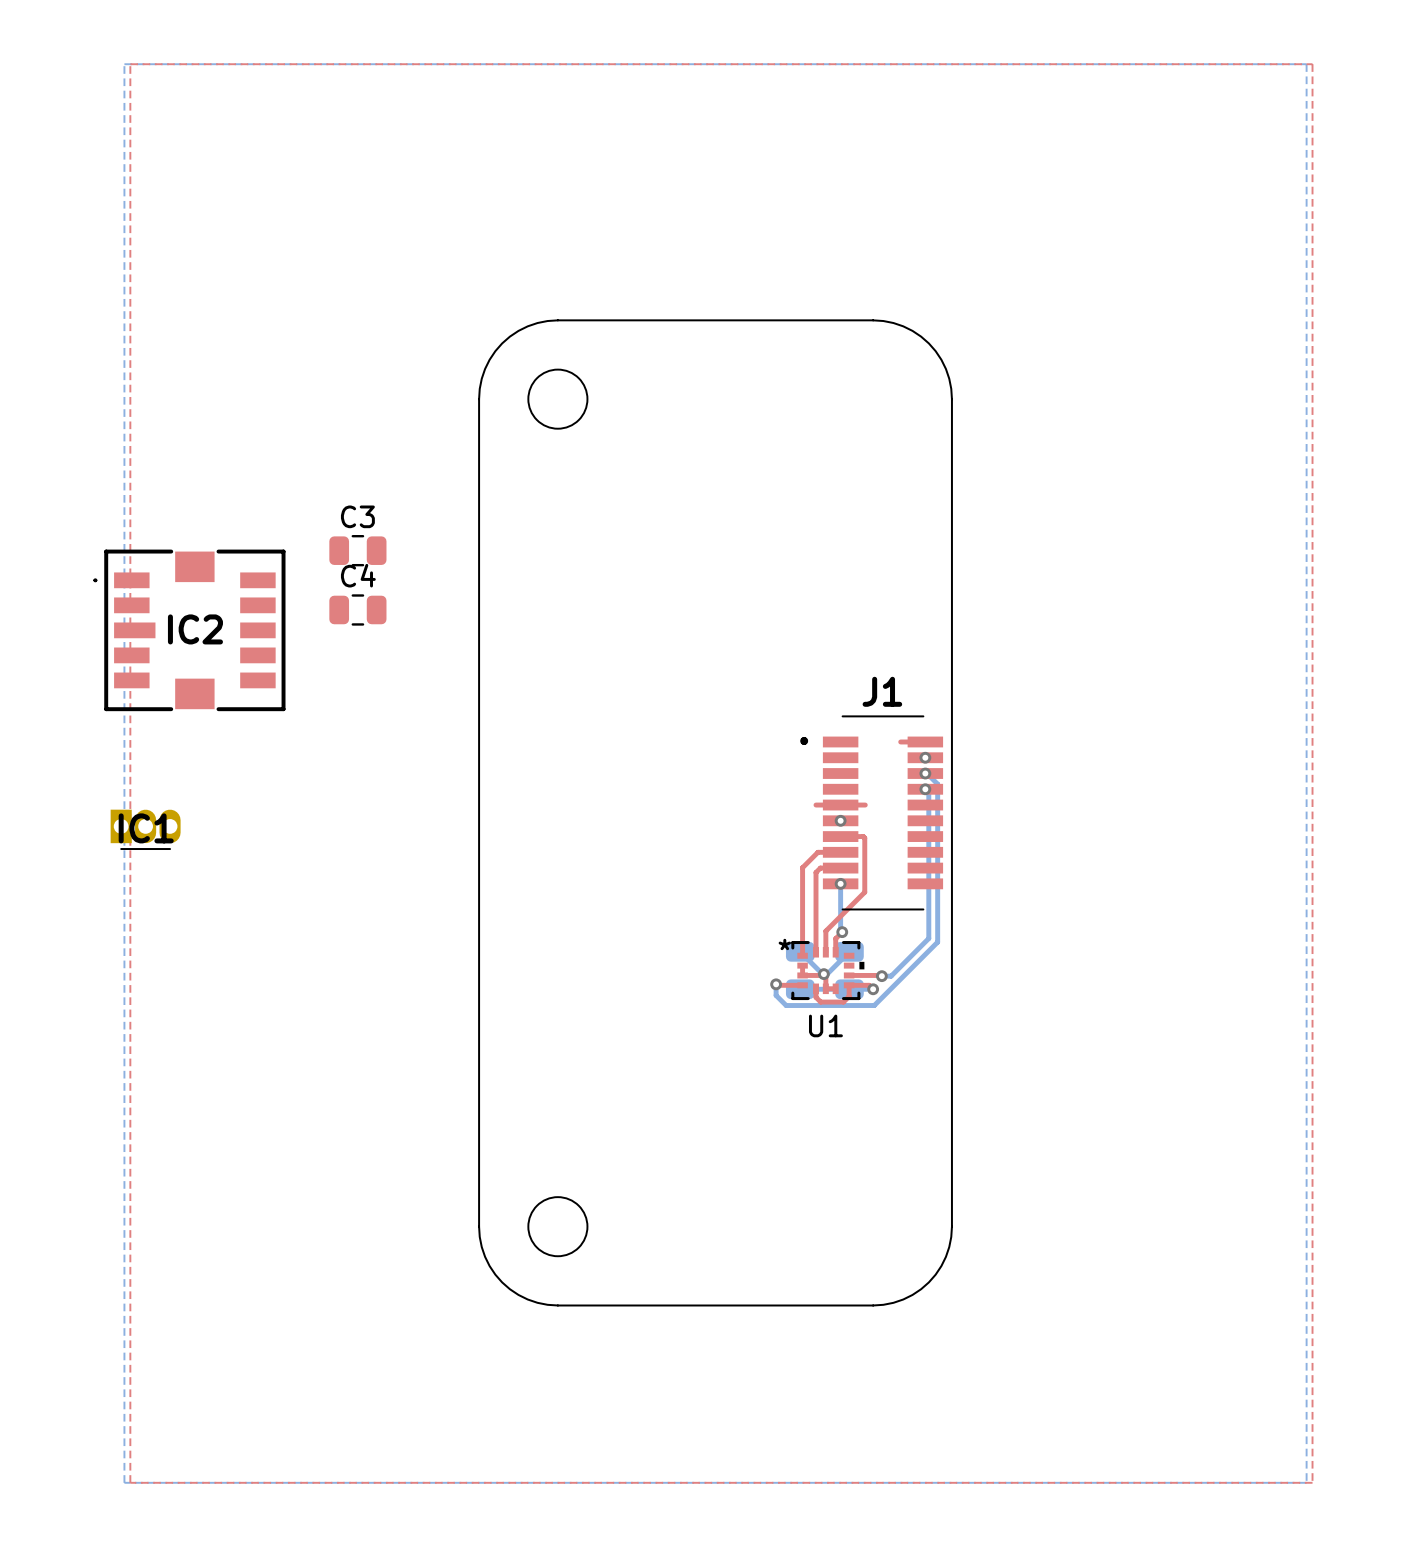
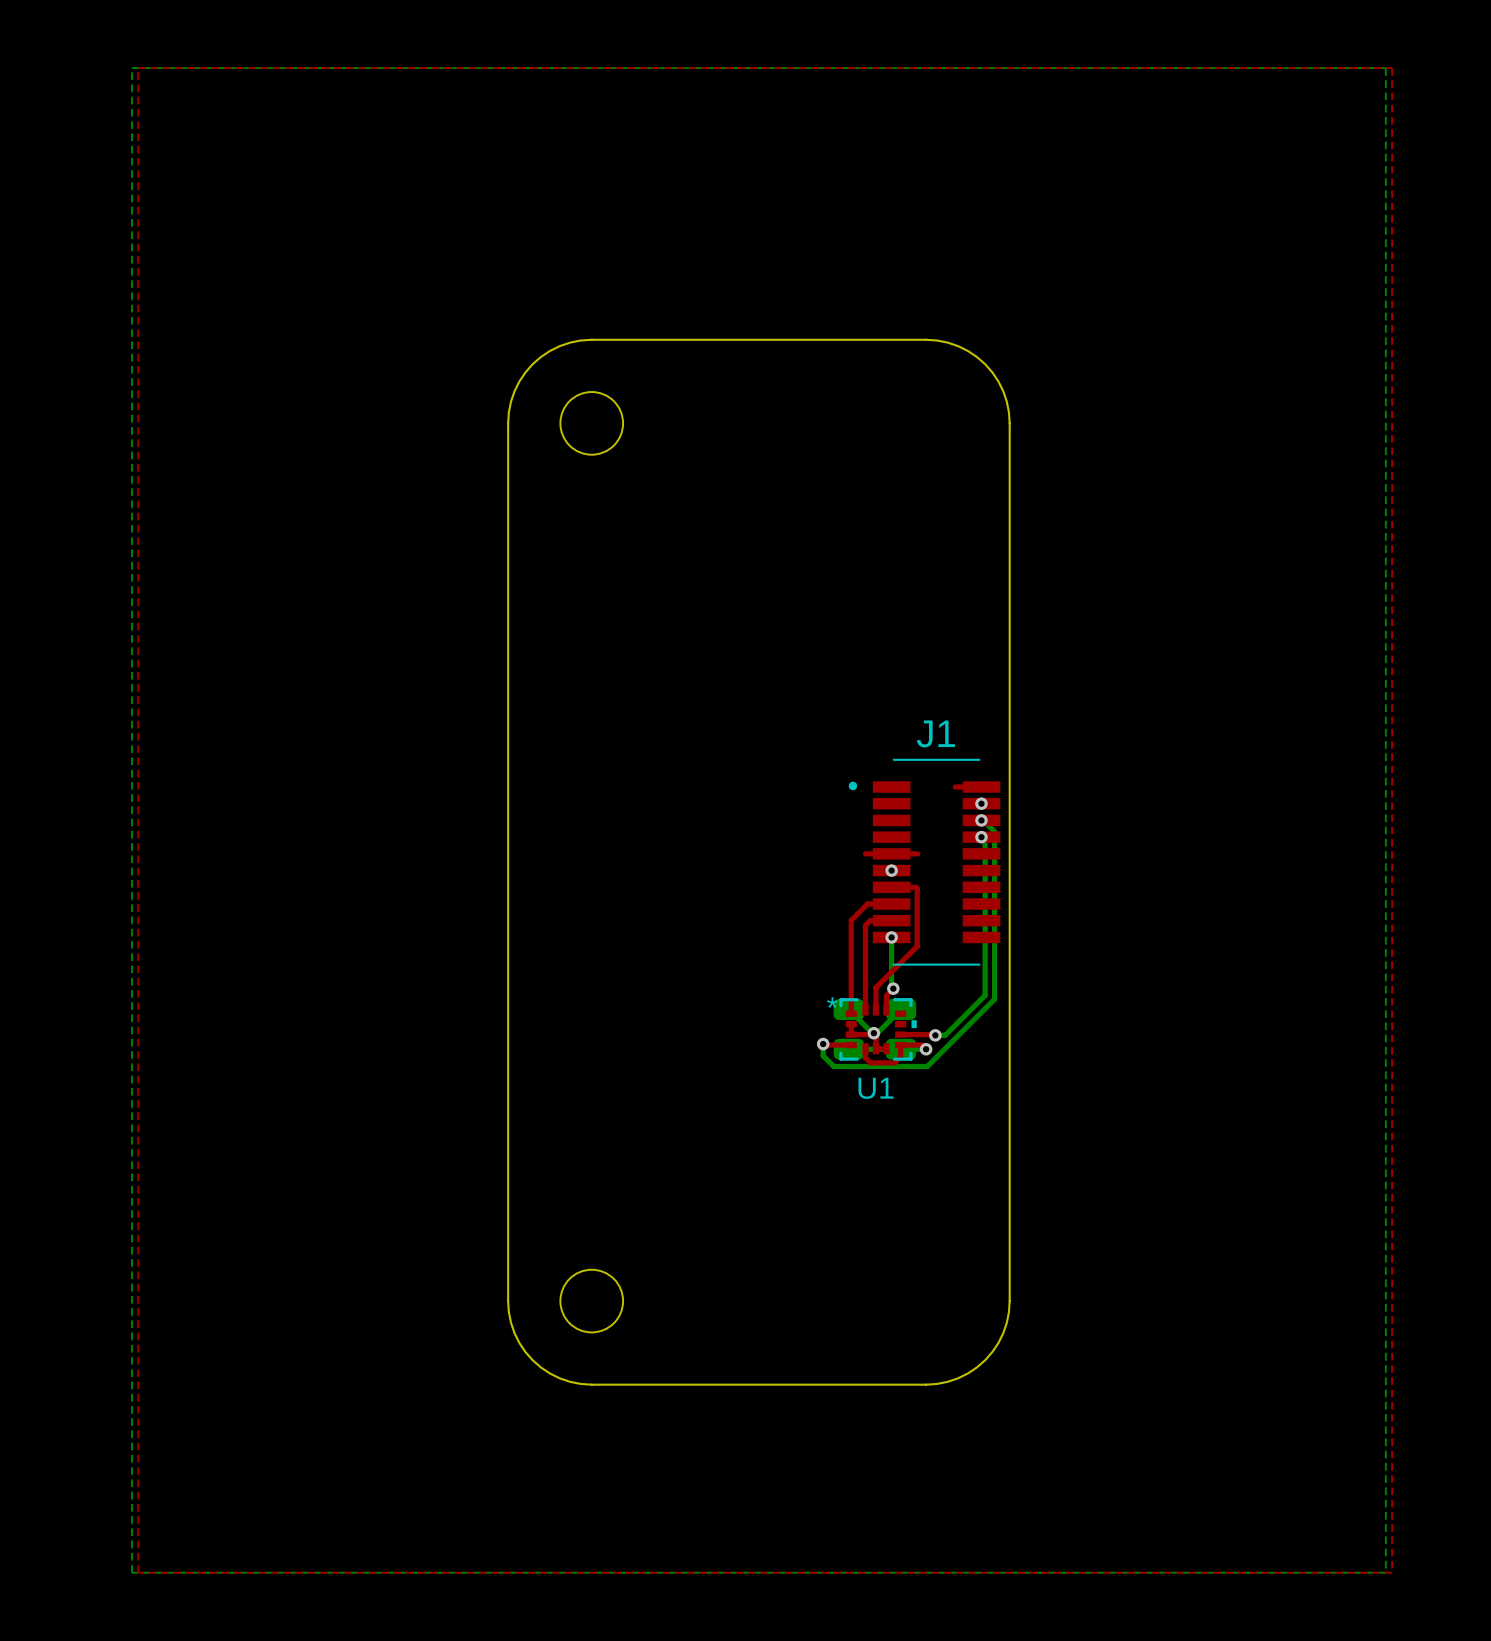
C3: (357, 550) -> none
C4: (357, 609) -> none
IC2: (189, 630) -> none
IC1: (145, 829) -> none

